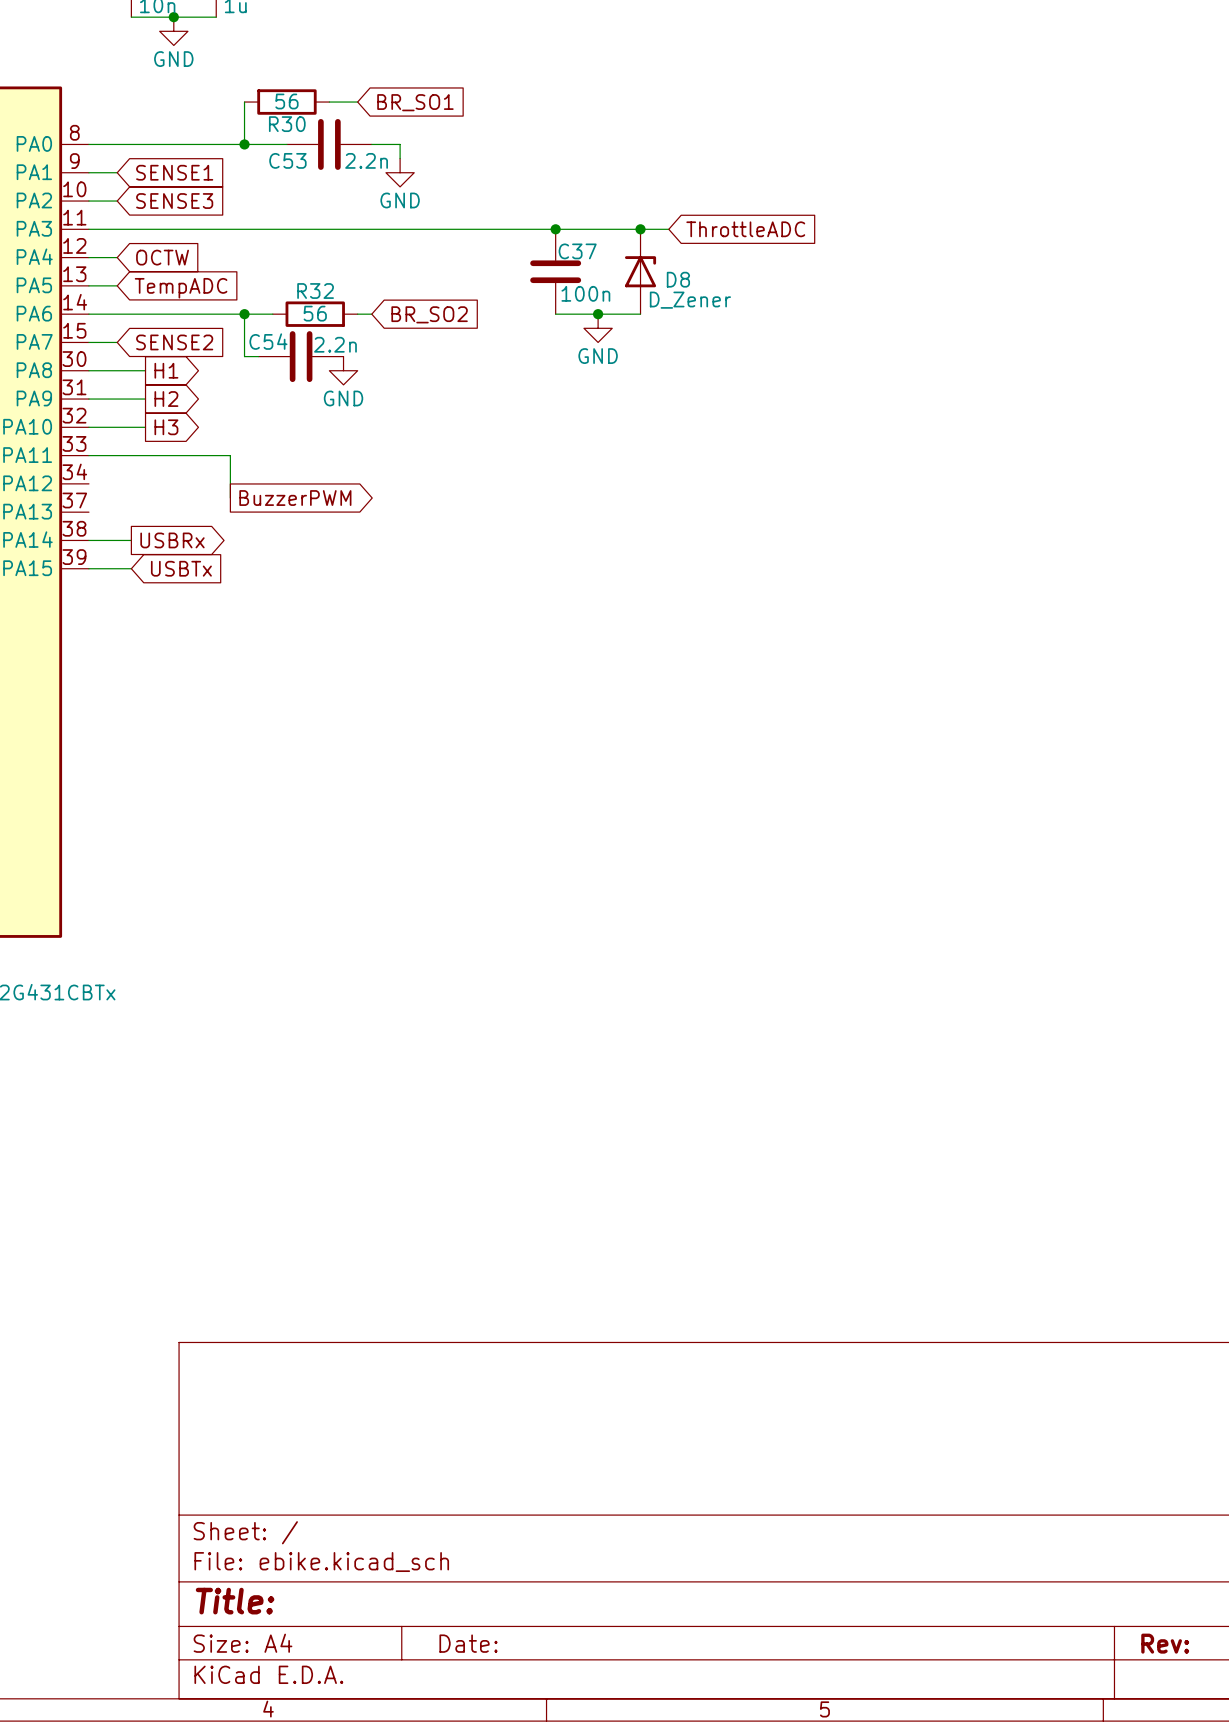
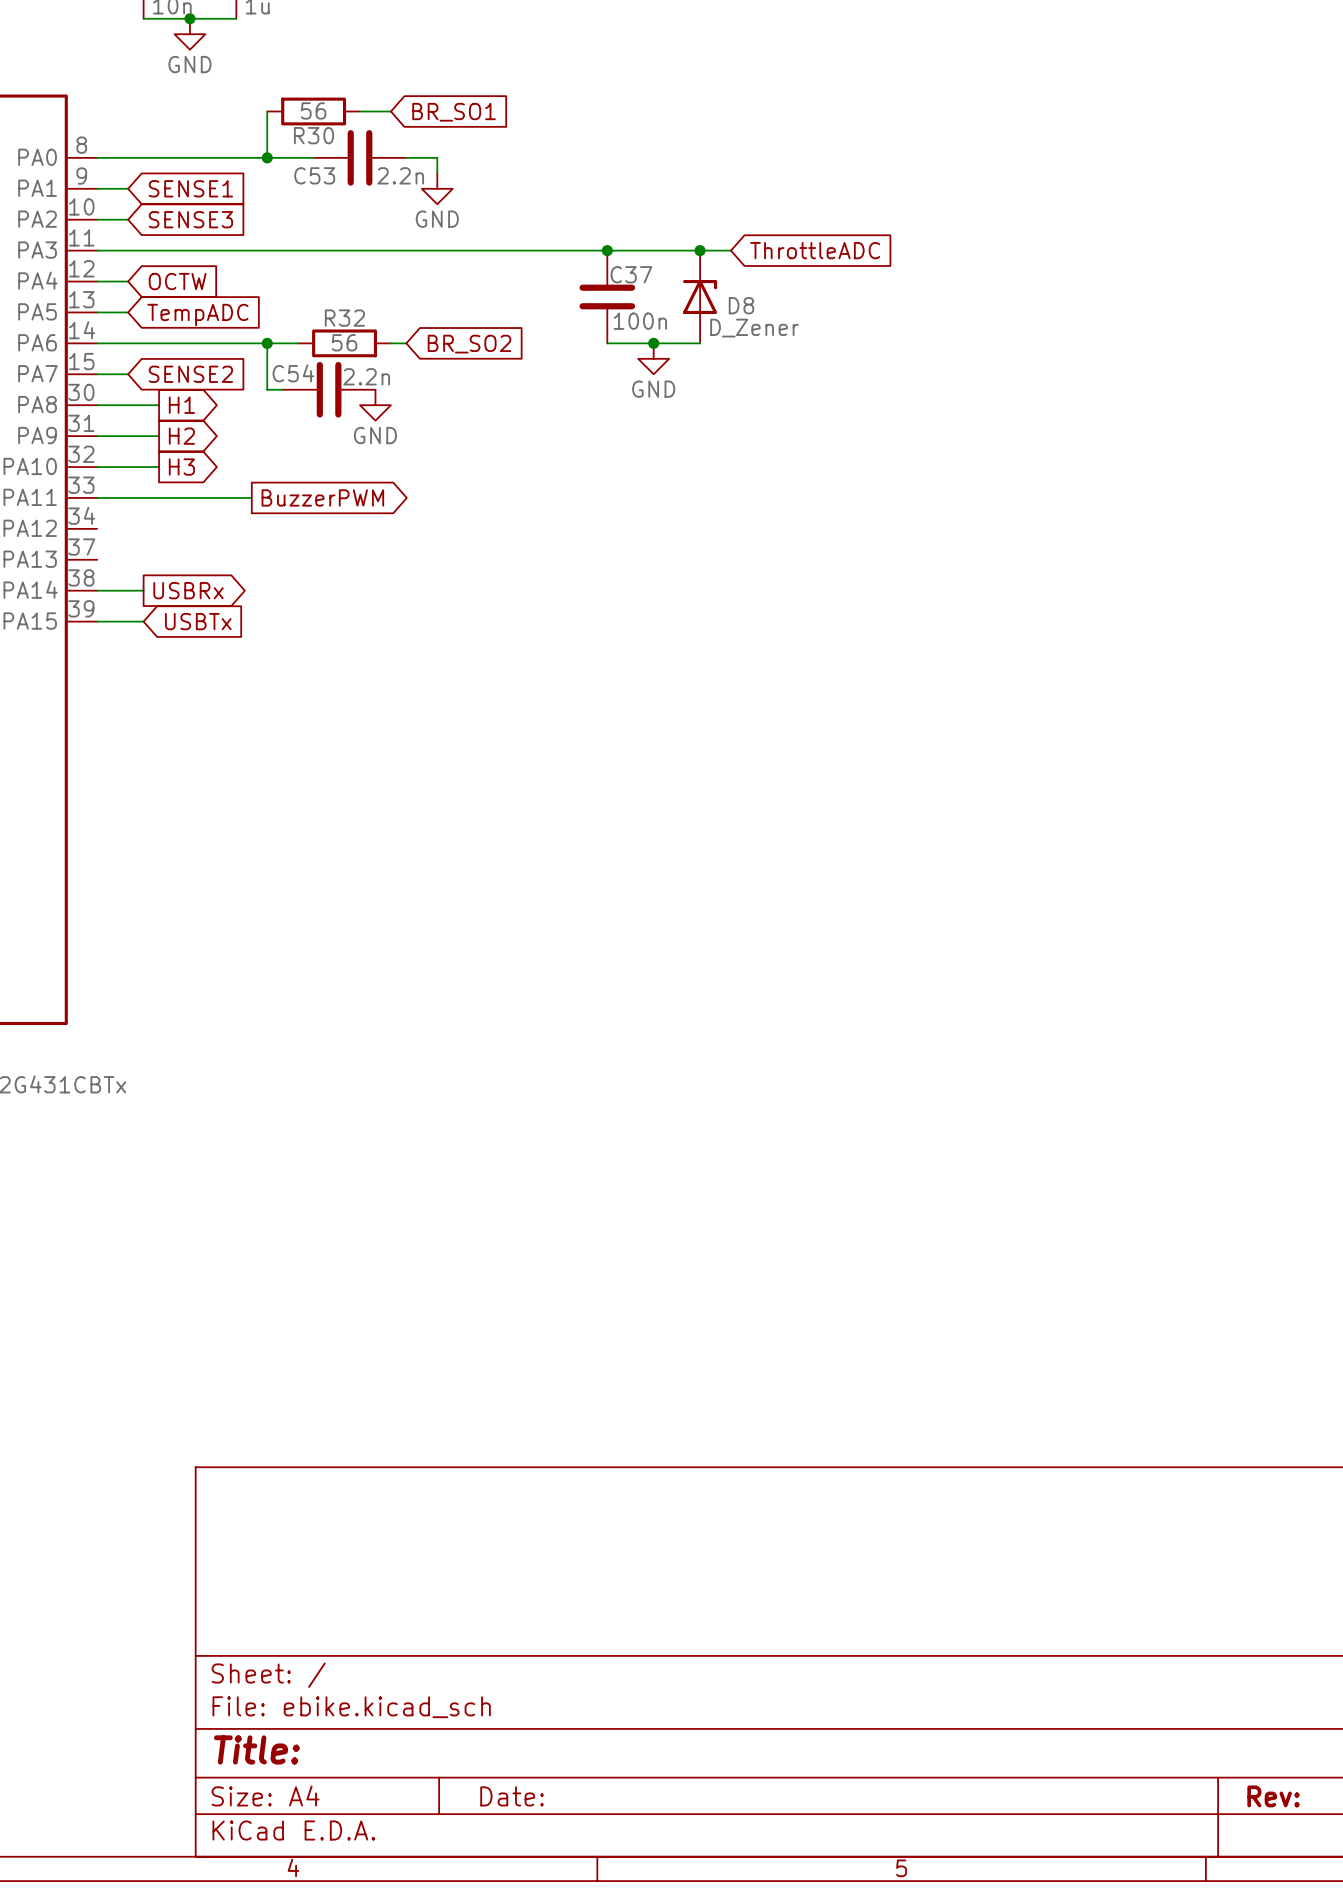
wire: (230, 455) (230, 498) -> none
global label position: BuzzerPWM (295, 498) -> BuzzerPWM (322, 497)

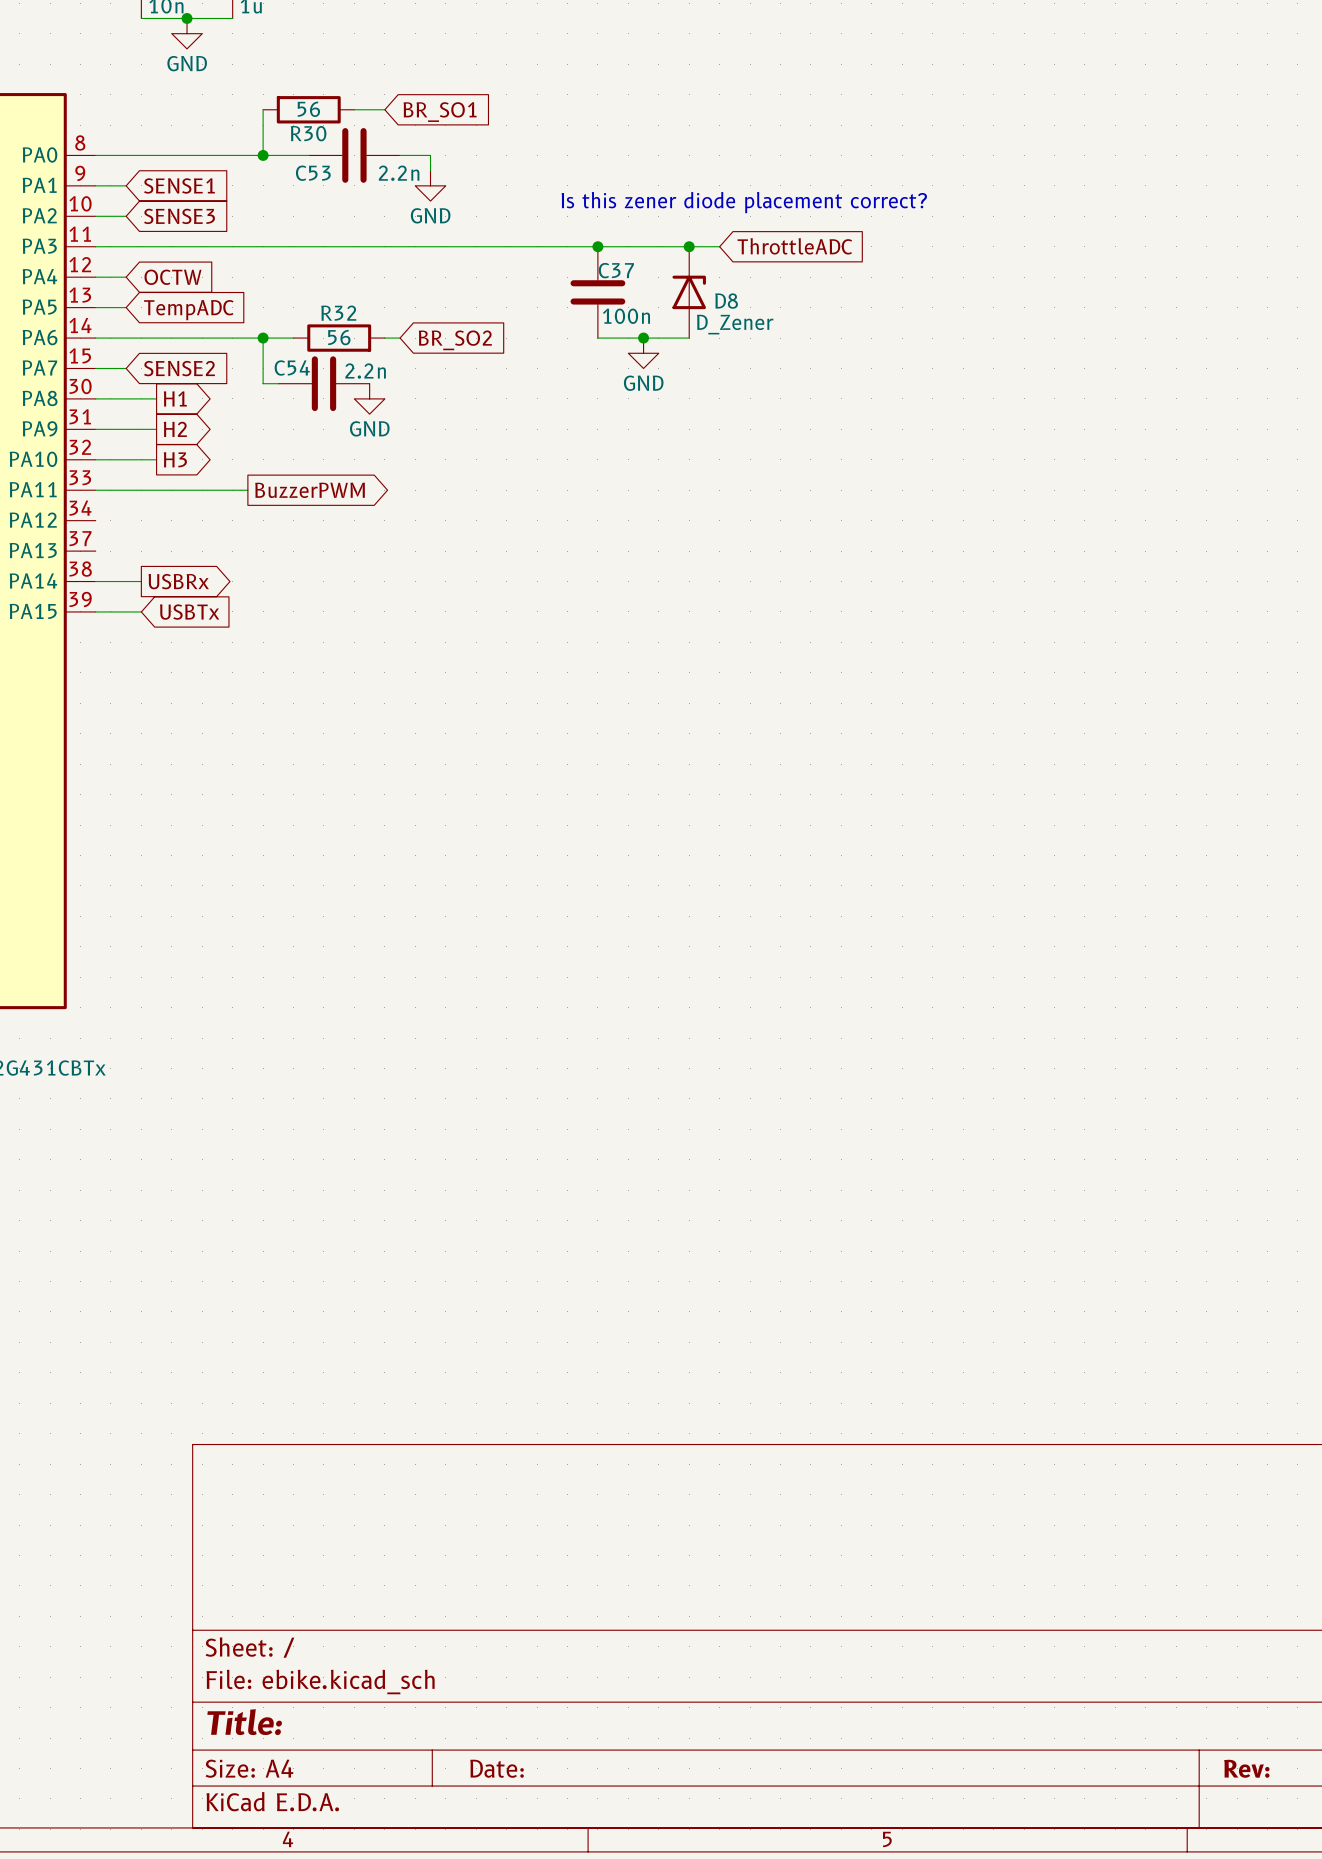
text: none -> Is this zener diode placement correct? (744, 202)

